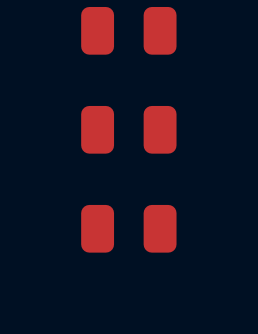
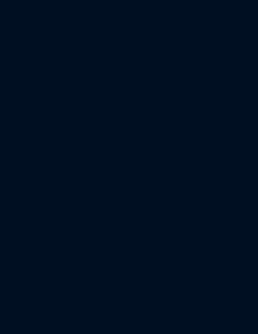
part: (128, 30) -> none
part: (128, 129) -> none
part: (128, 228) -> none

